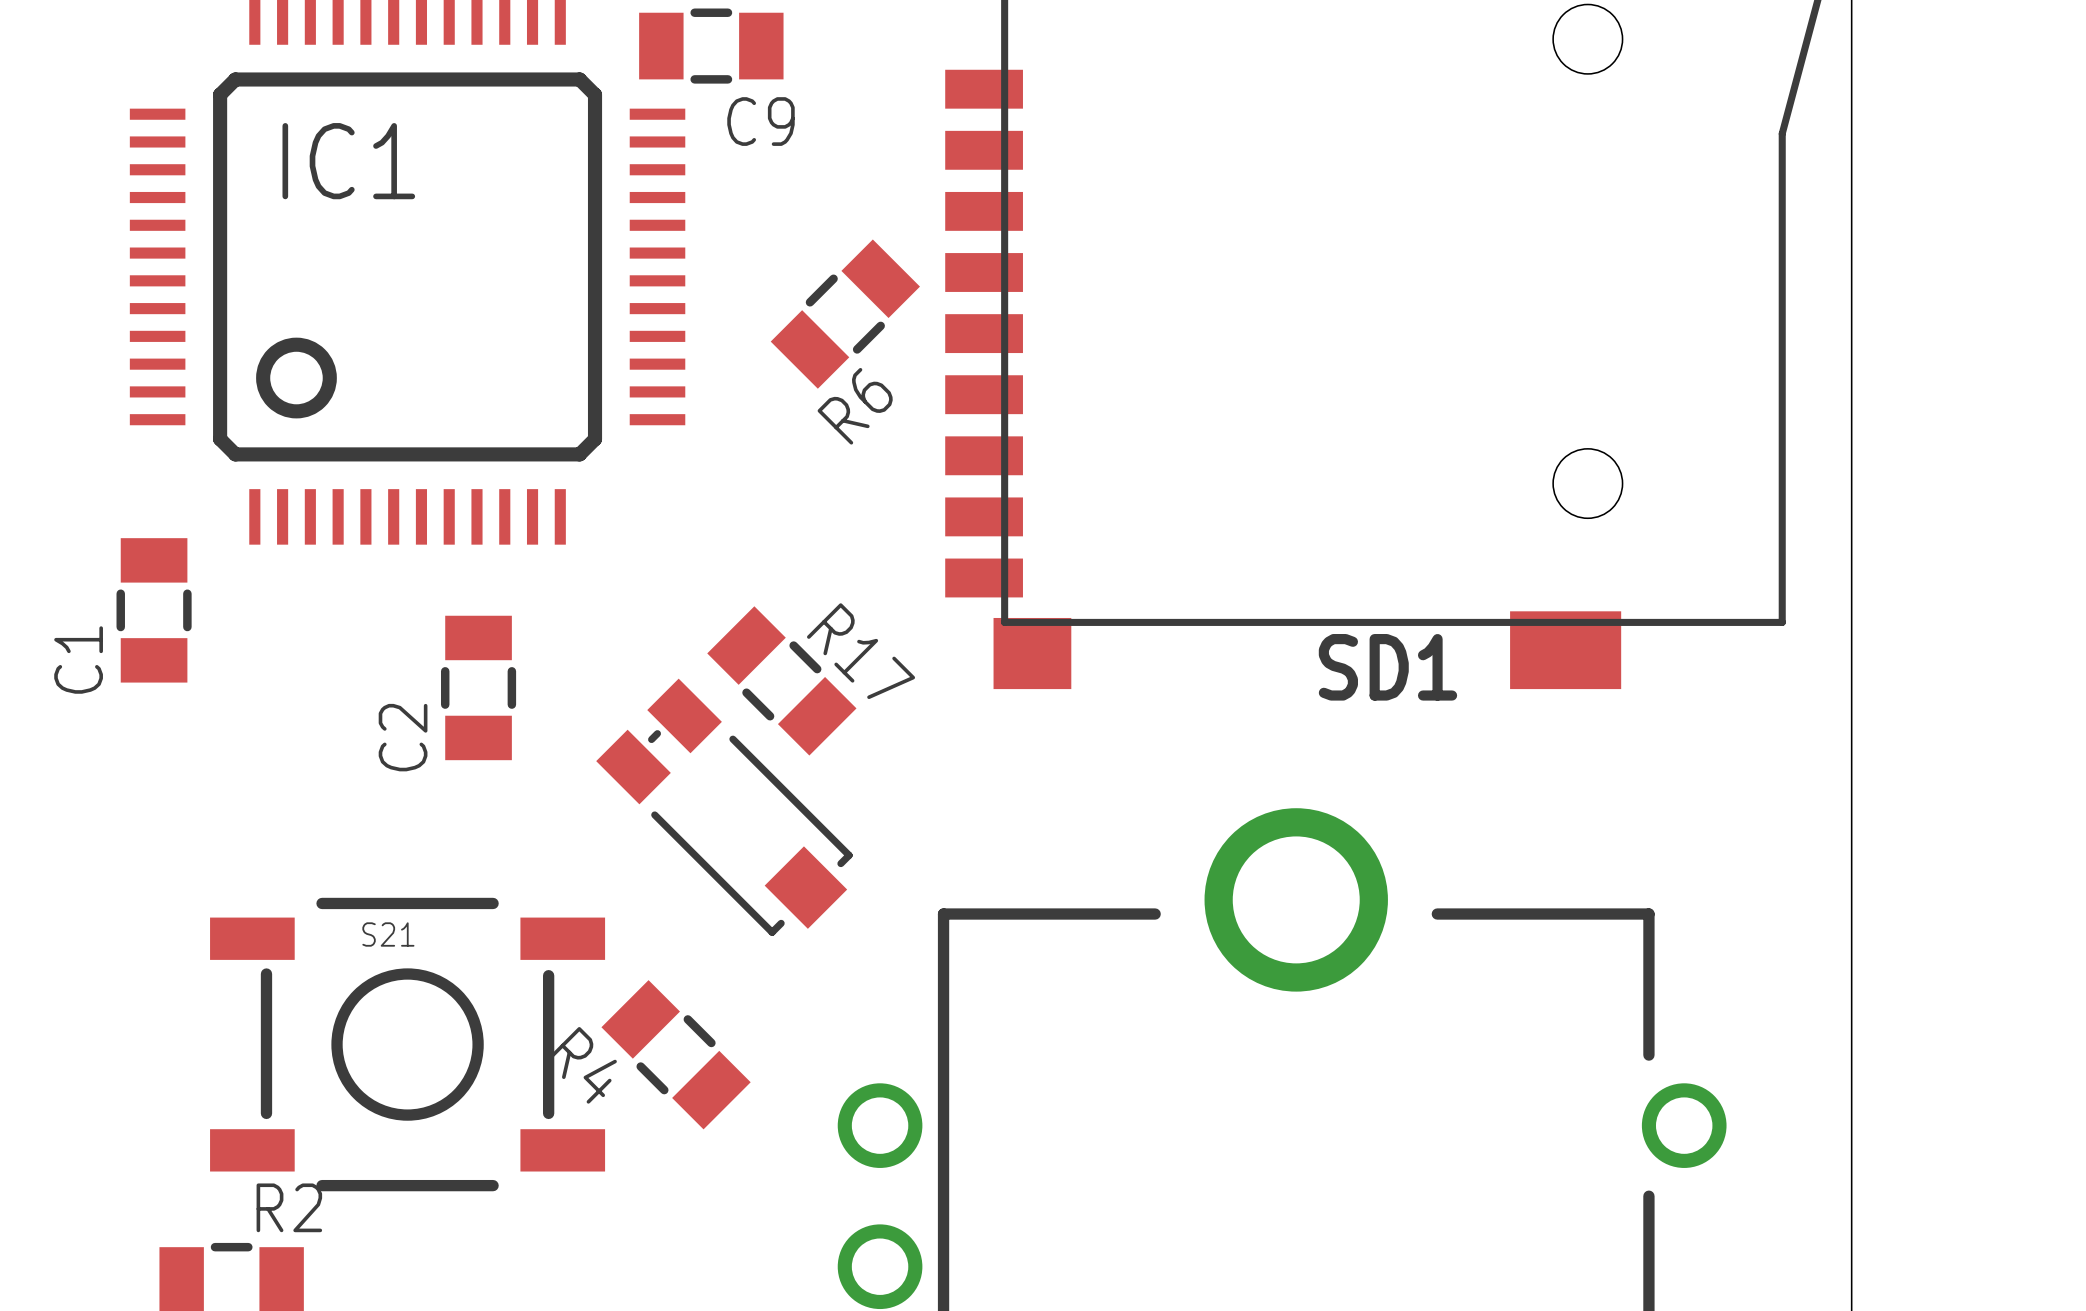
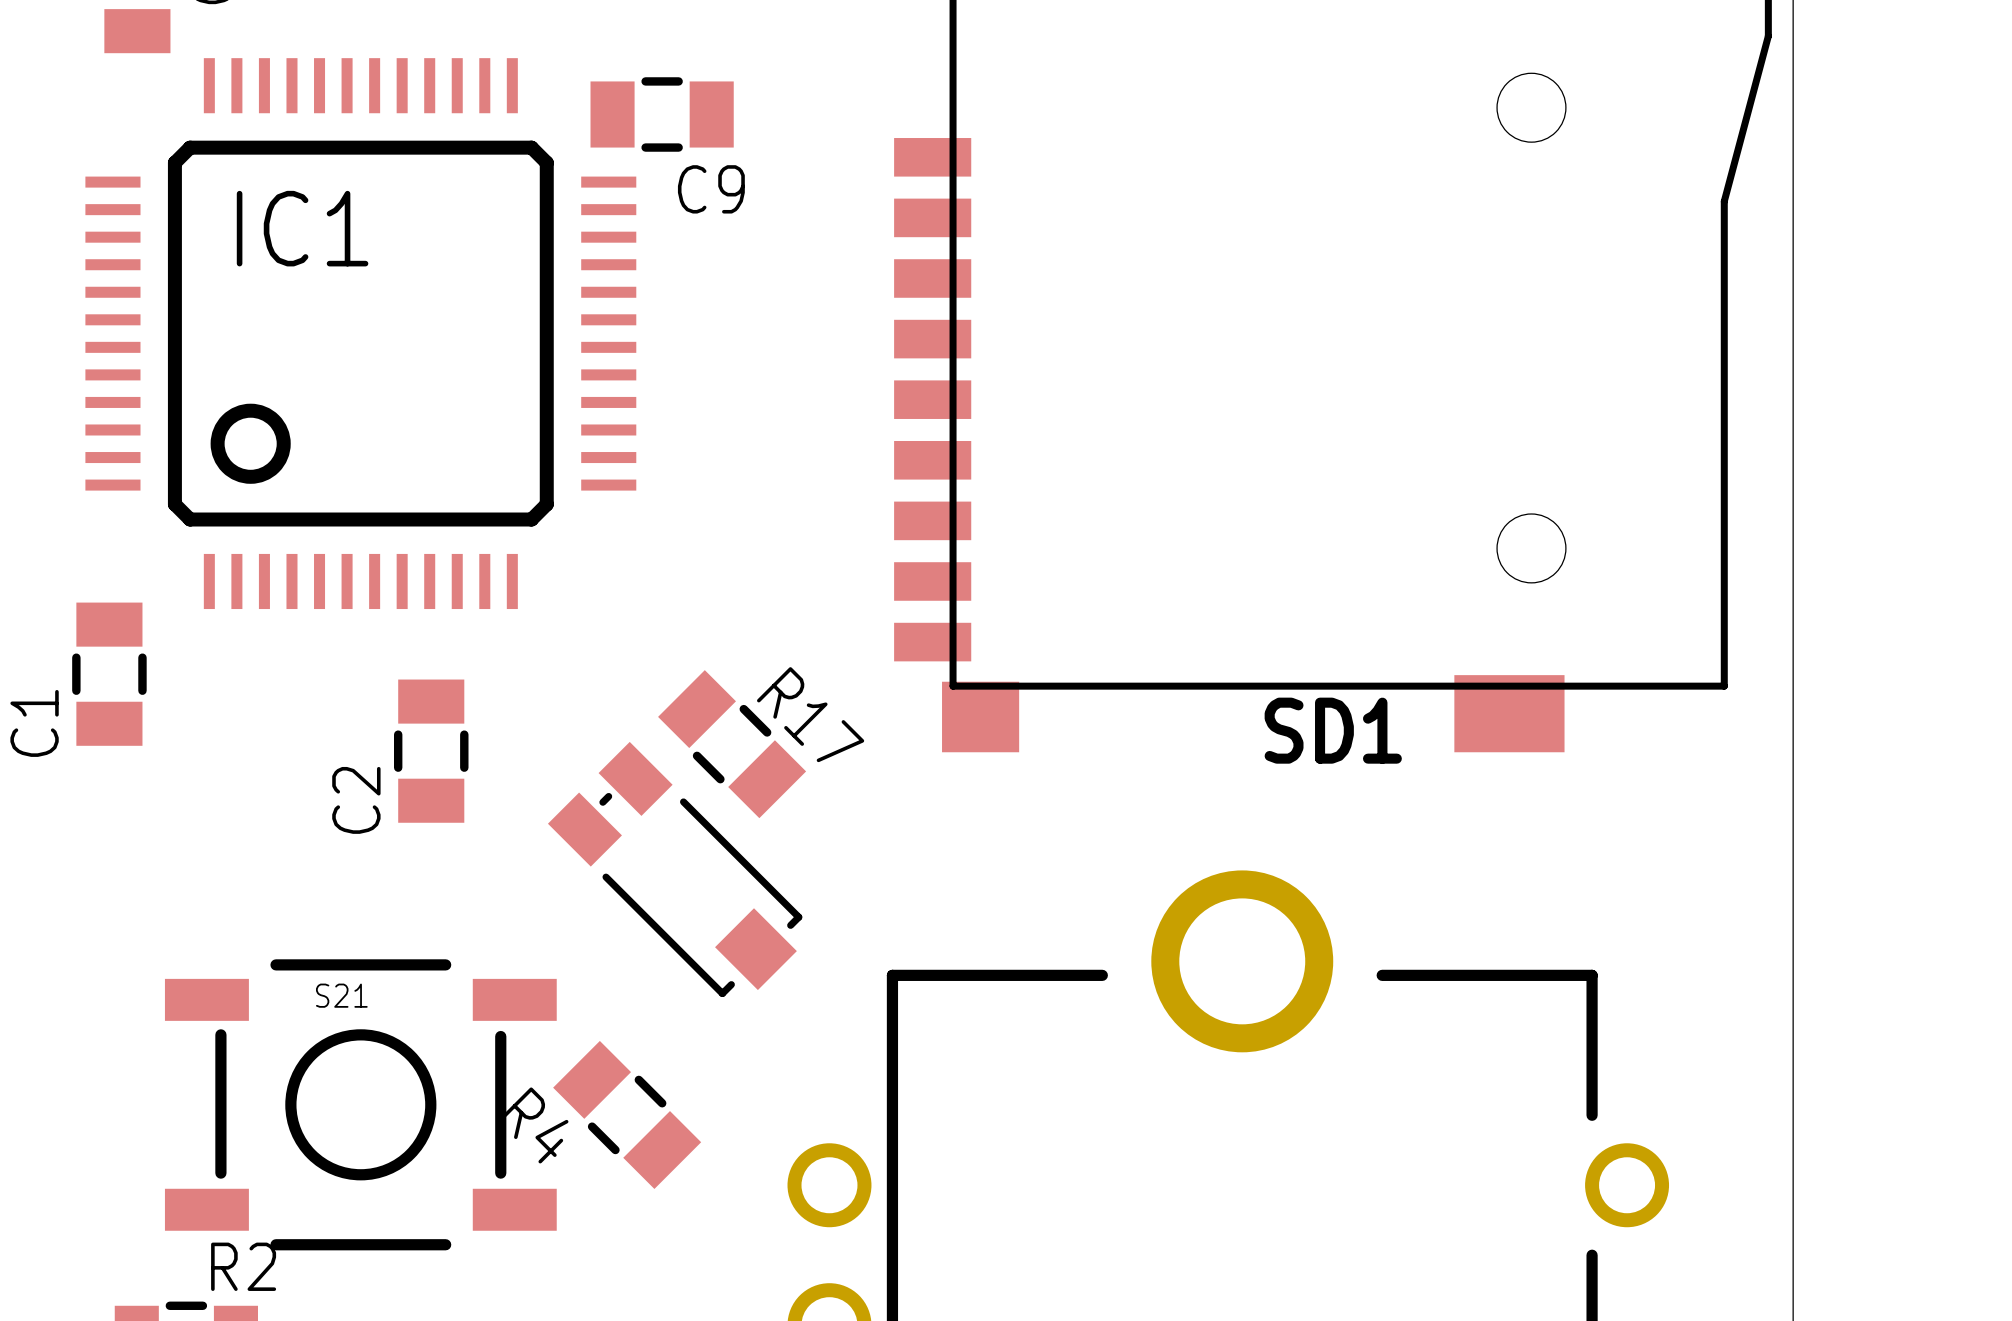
R6: (845, 314) -> none

